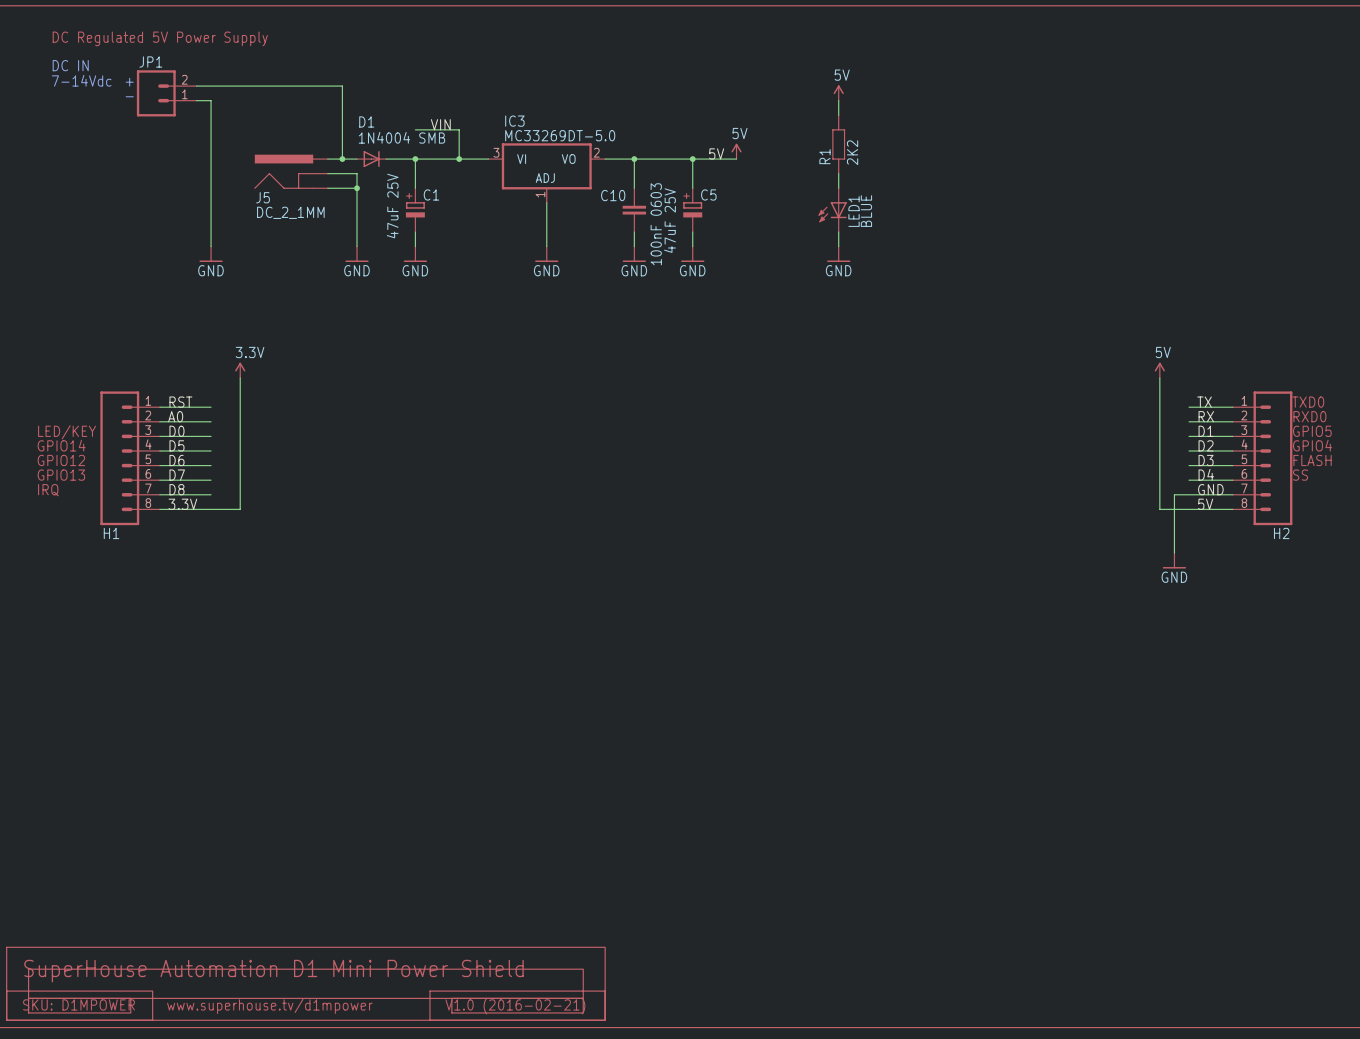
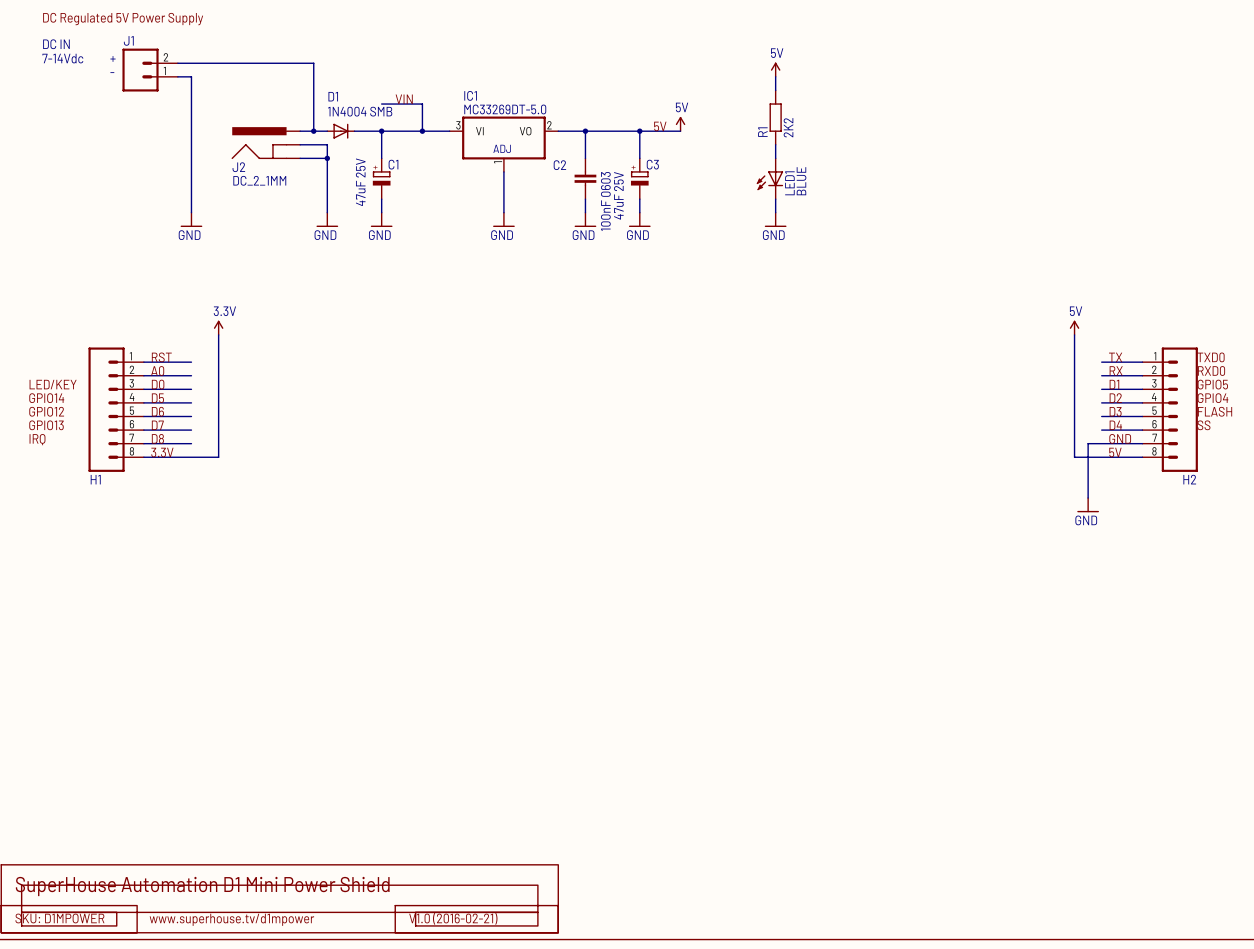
JP1 name: JP1 (150, 61) -> J1 (128, 40)
IC3 name: IC3 (514, 121) -> IC1 (470, 95)
C5 name: C5 (708, 194) -> C3 (652, 164)
C10 name: C10 (613, 195) -> C2 (559, 165)
J5 name: J5 (263, 197) -> J2 (238, 167)

